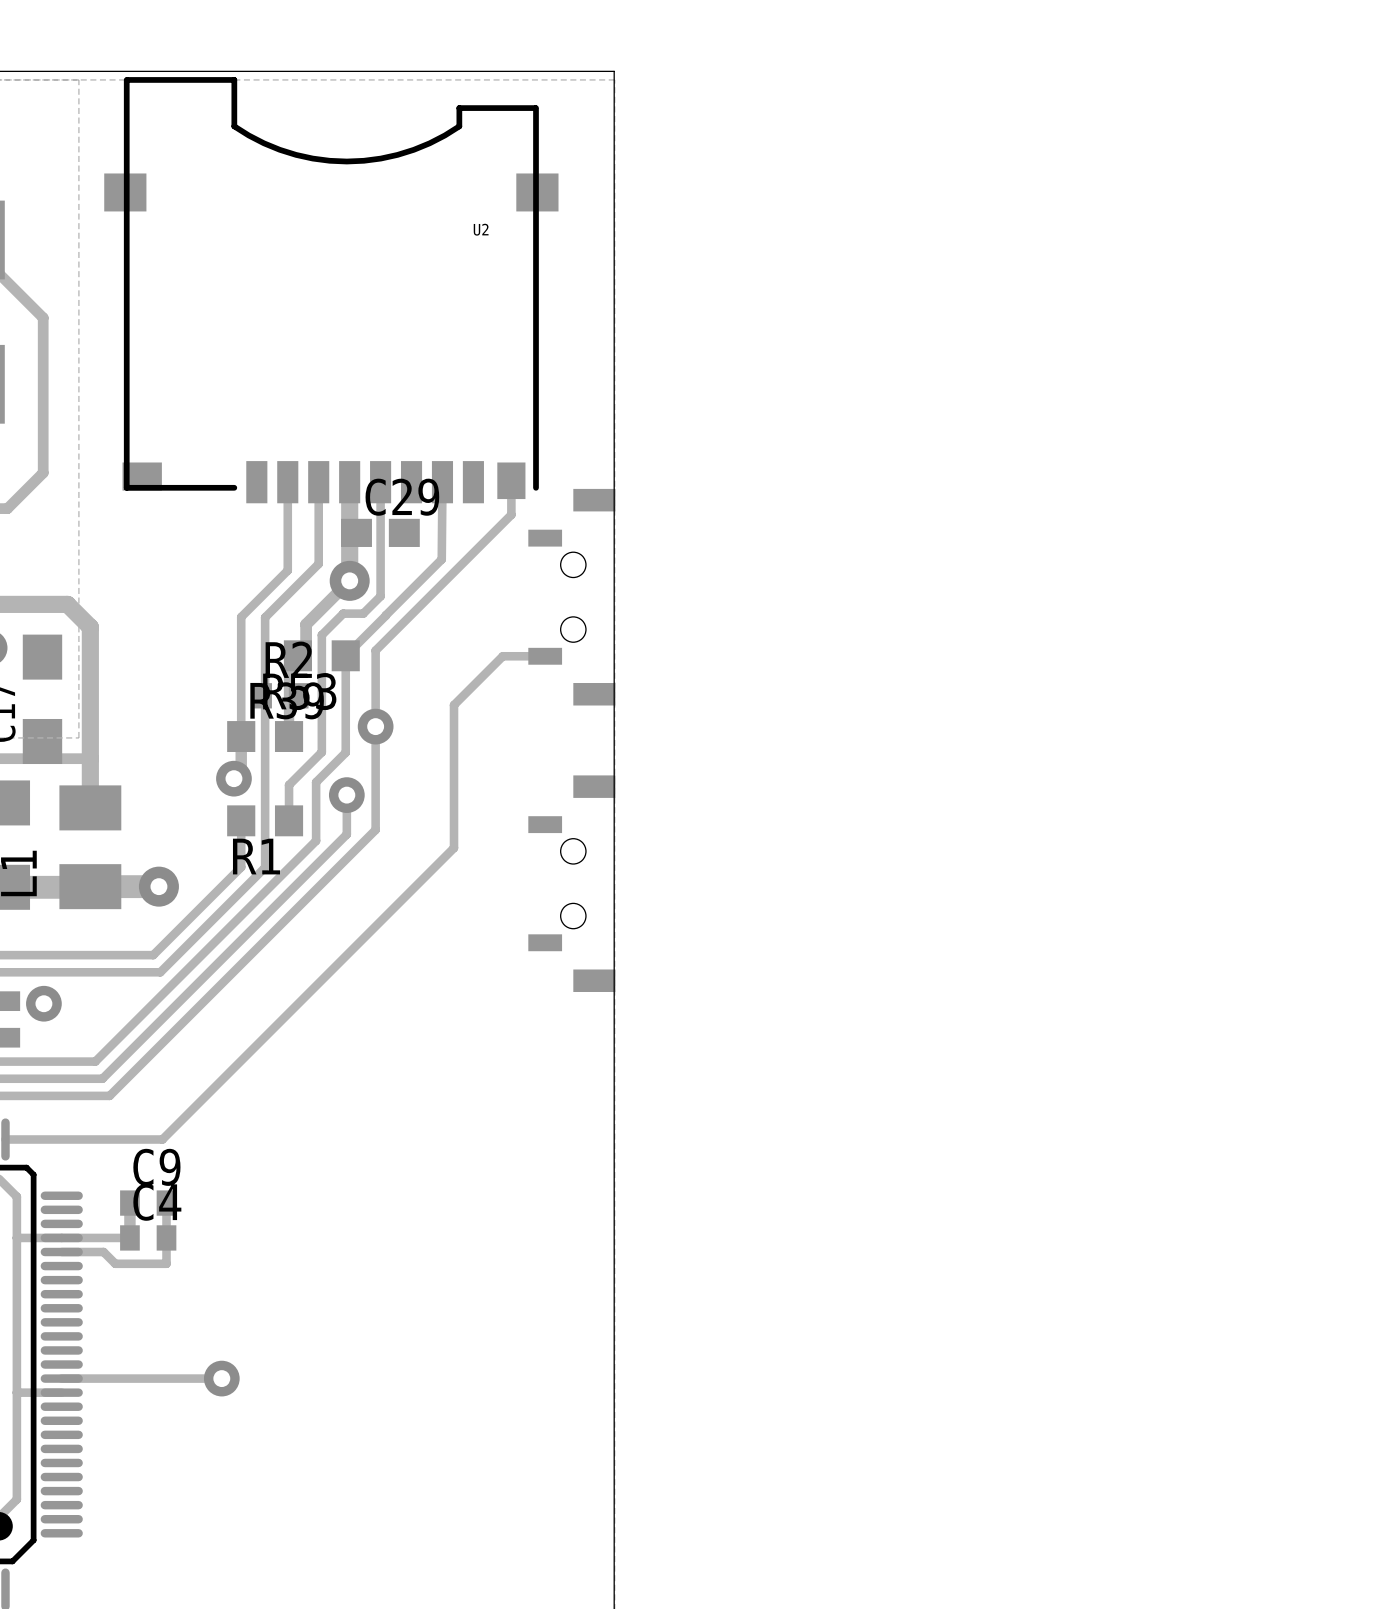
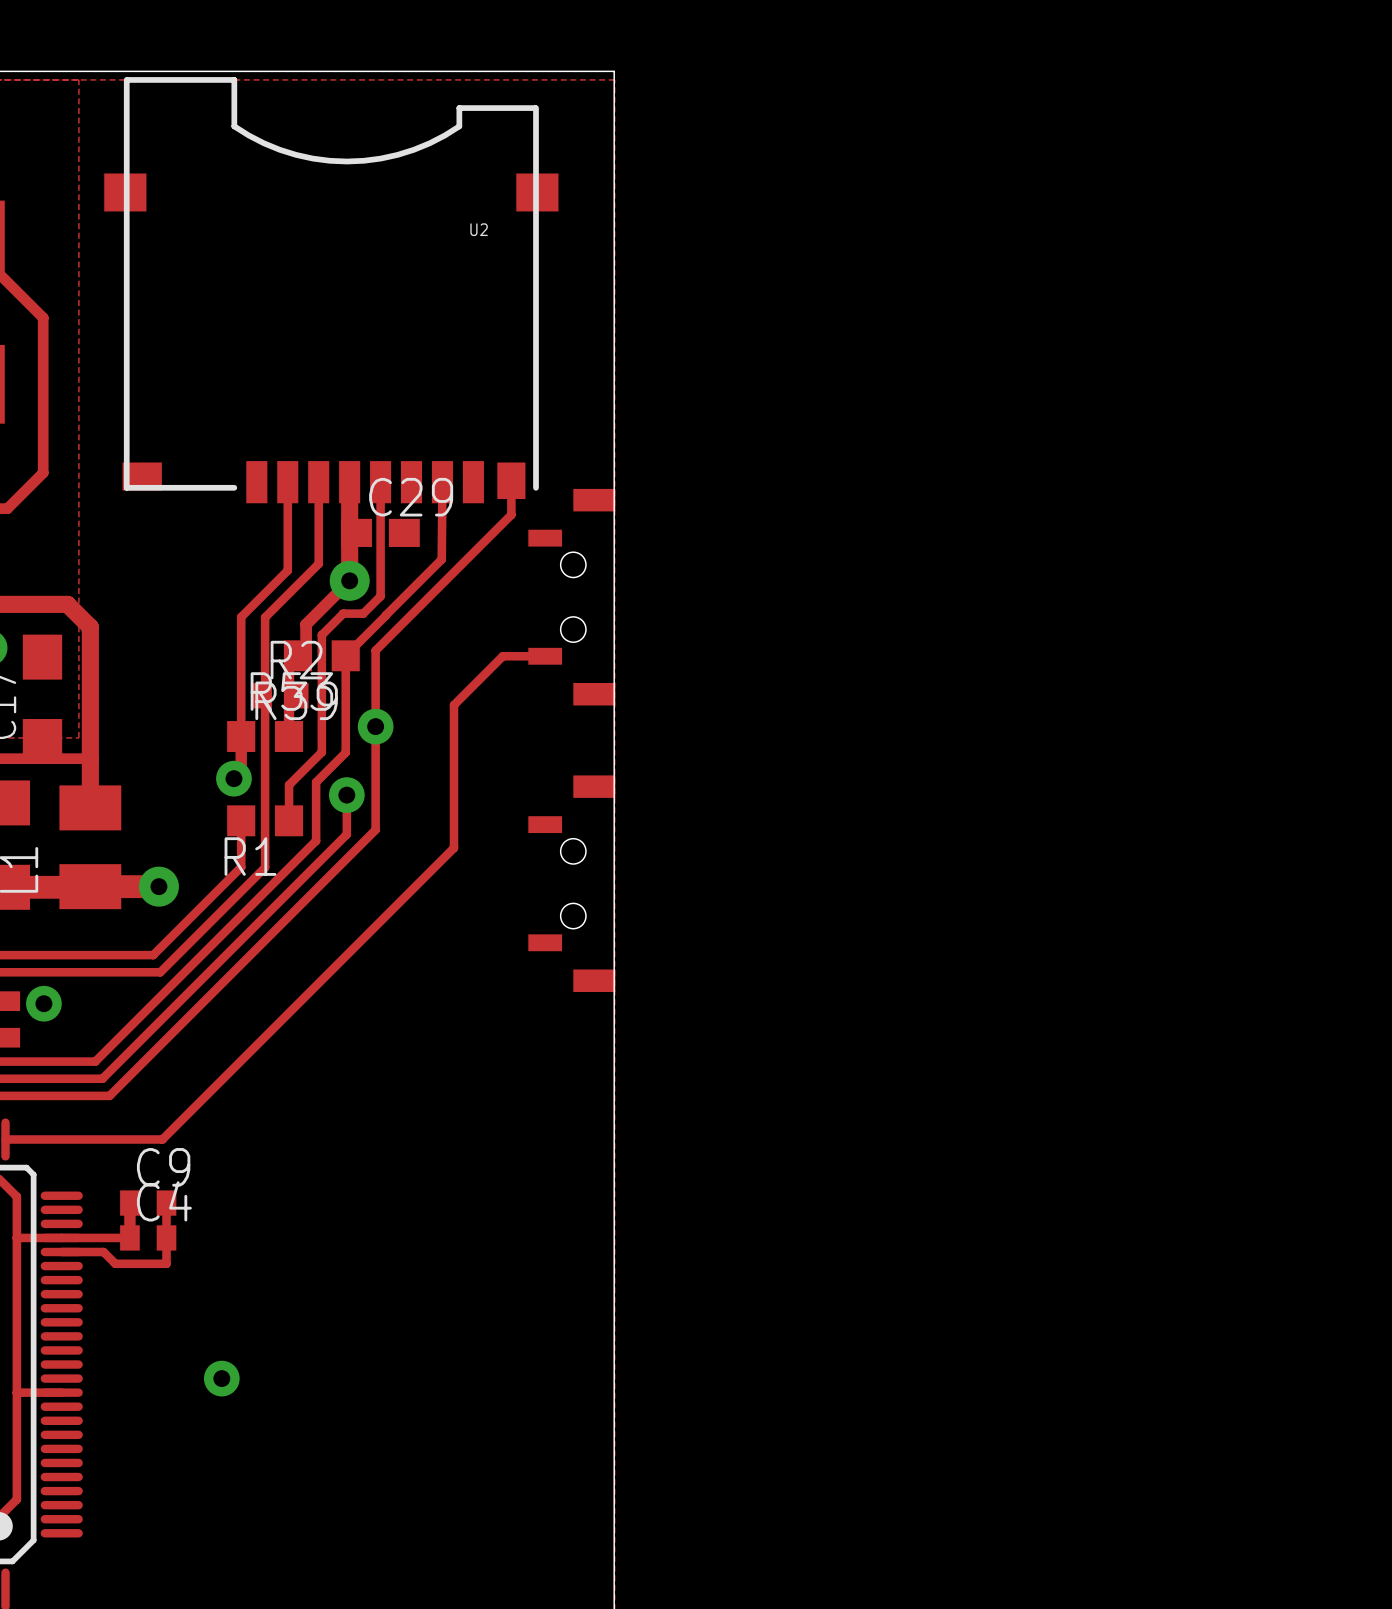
track: (61, 1378) (221, 1378) -> none

